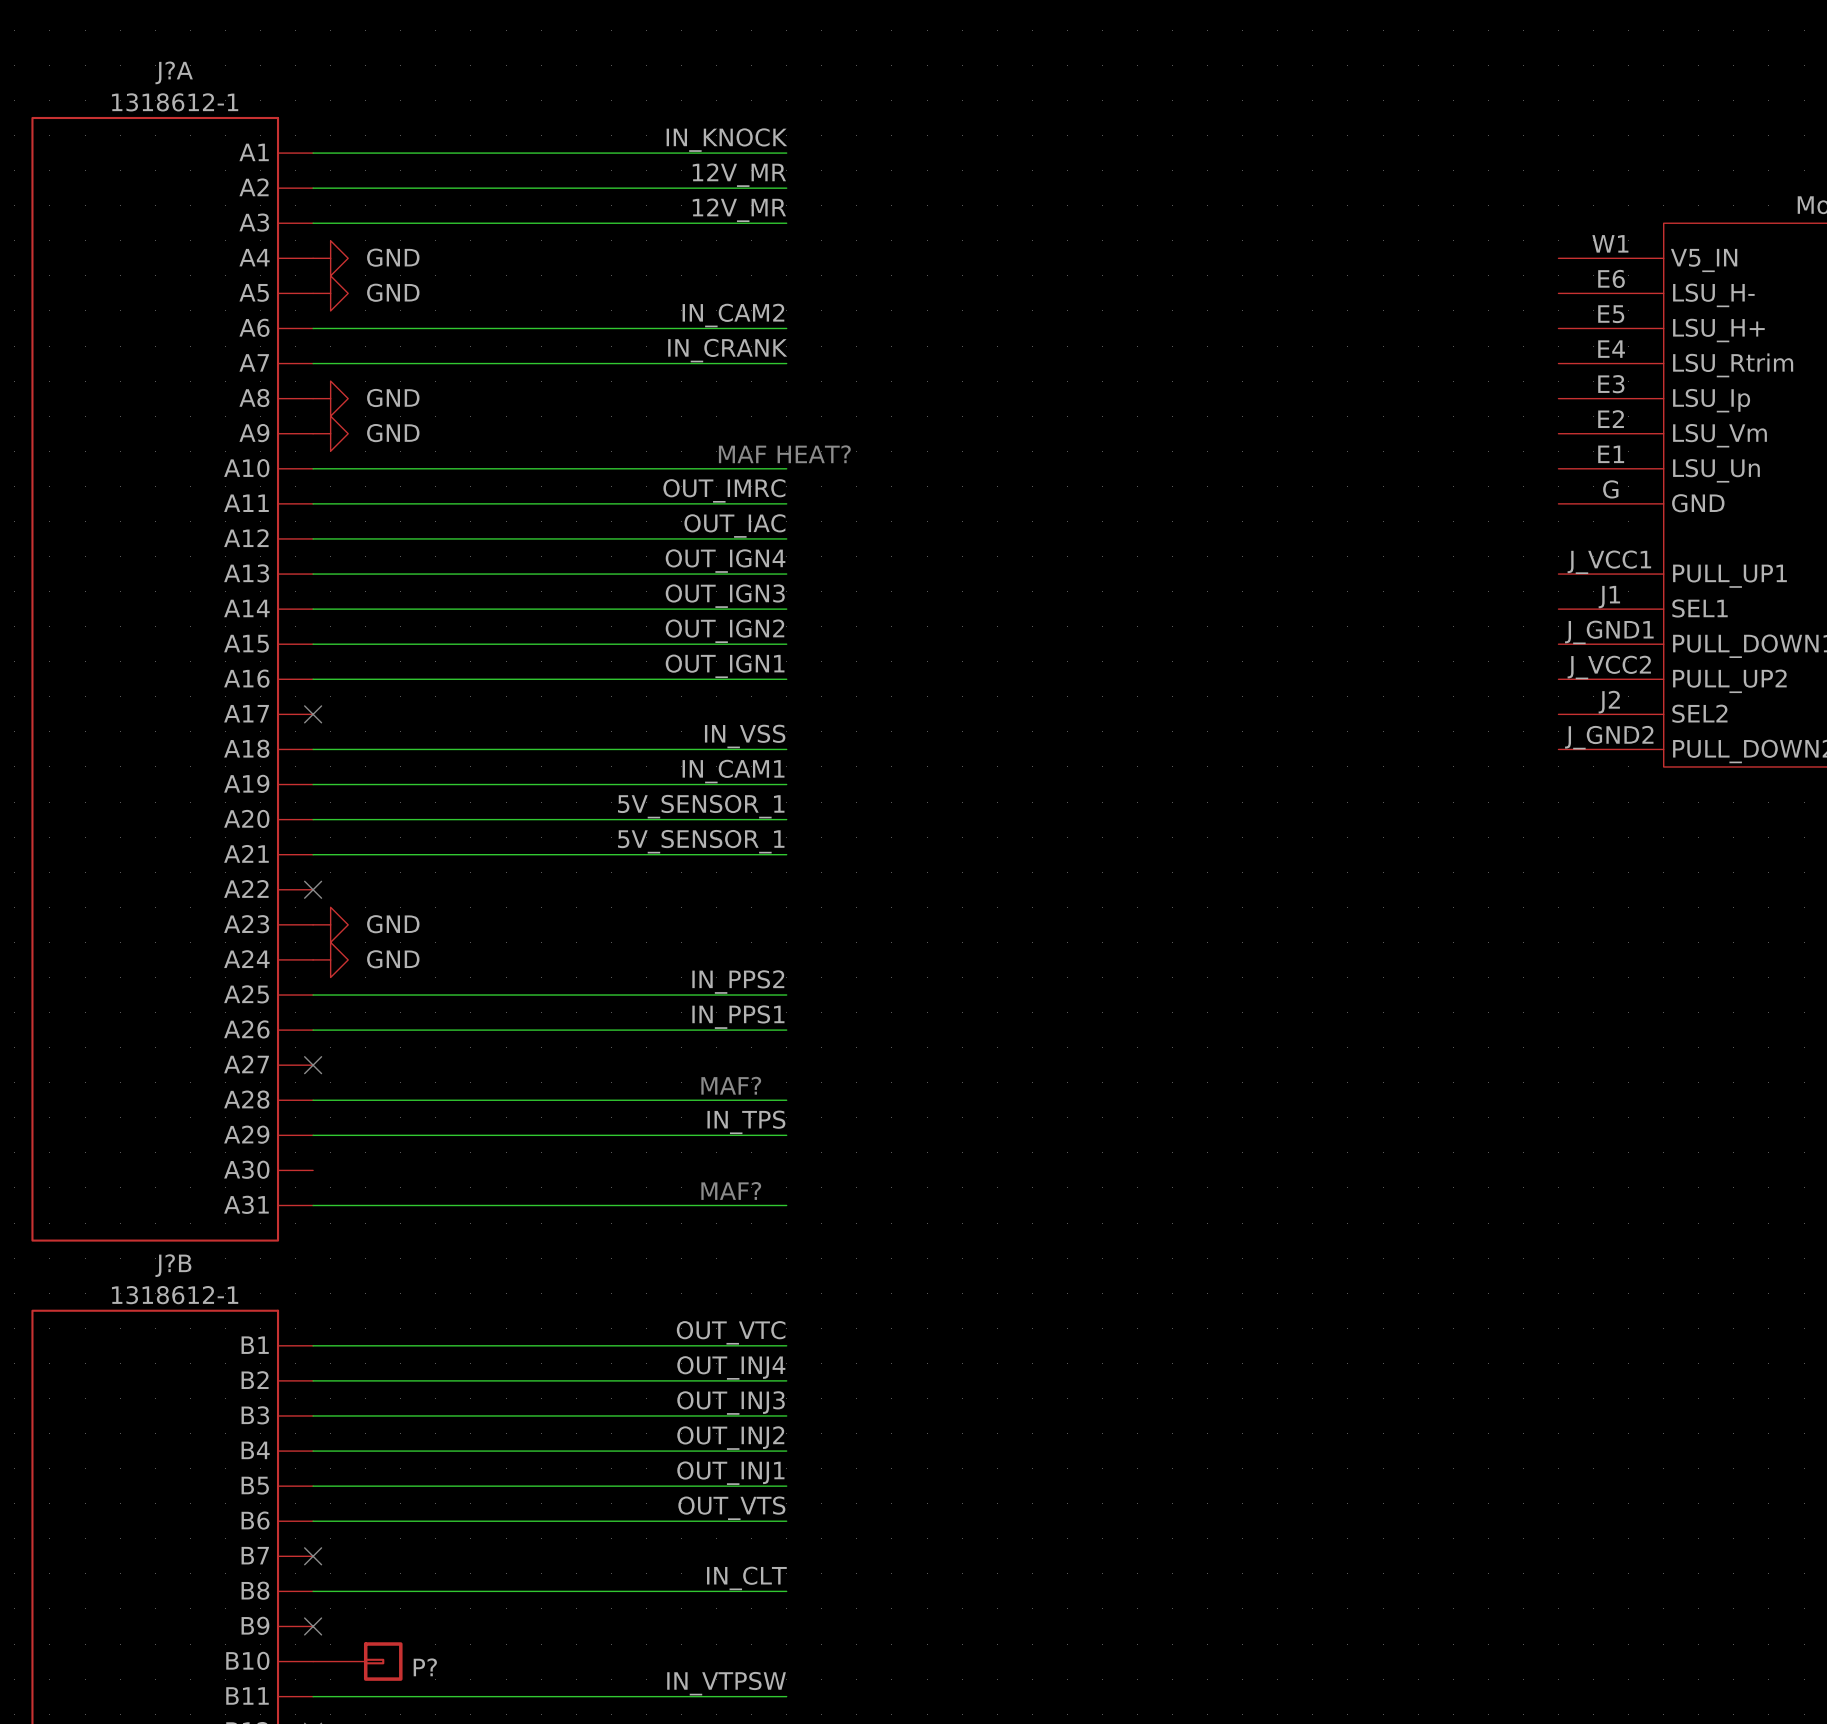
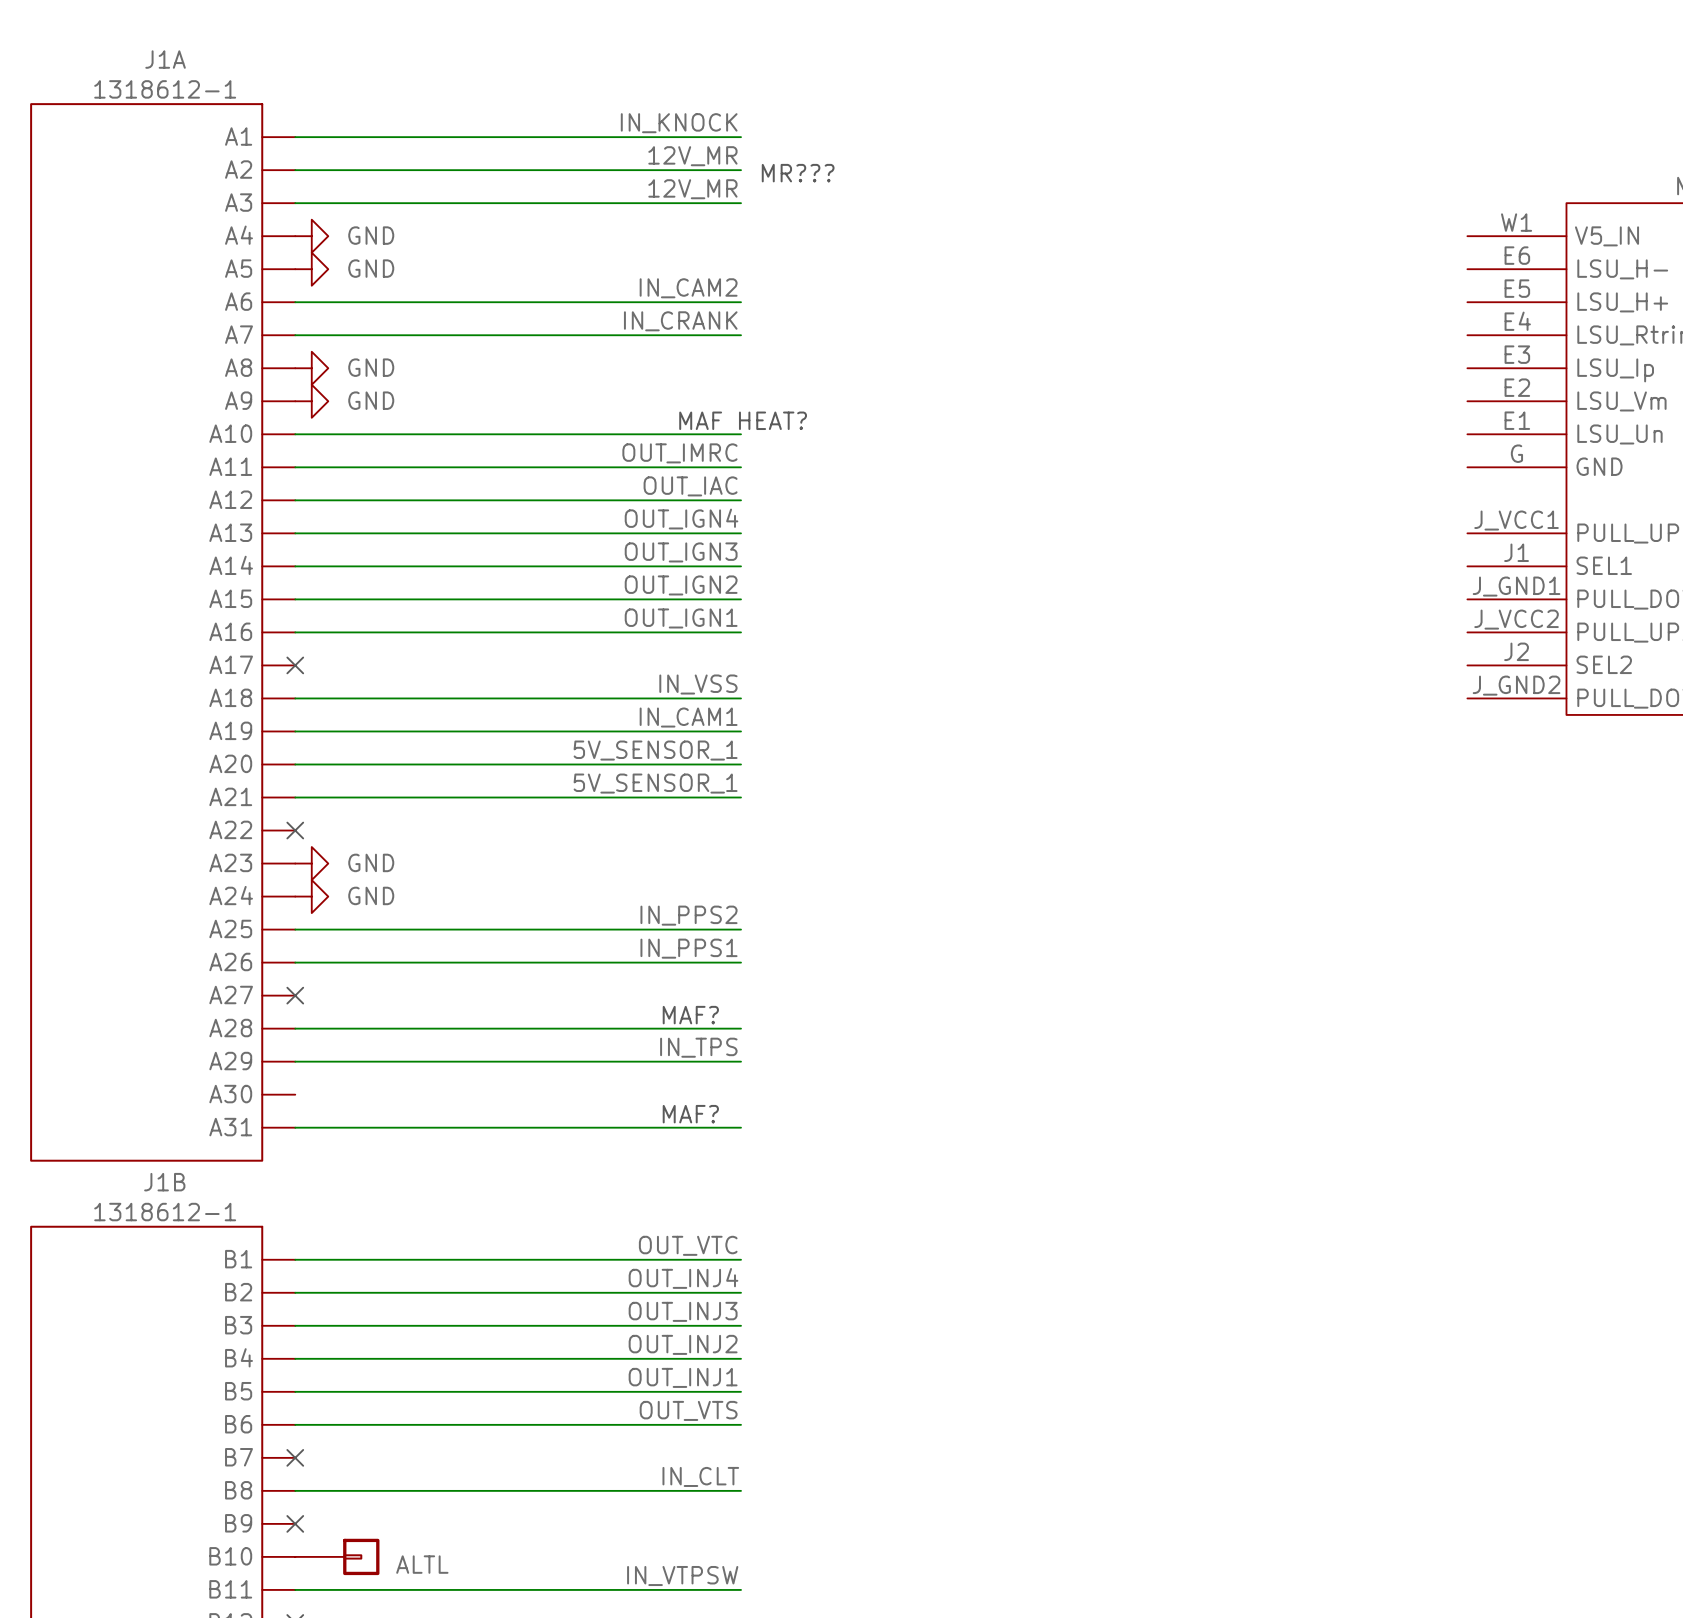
J?A name: J?A (174, 72) -> J1A (165, 59)
text: none -> MR??? (798, 173)
J?B name: J?B (173, 1265) -> J1B (164, 1182)
P? name: P? (425, 1667) -> ALTL (422, 1564)

